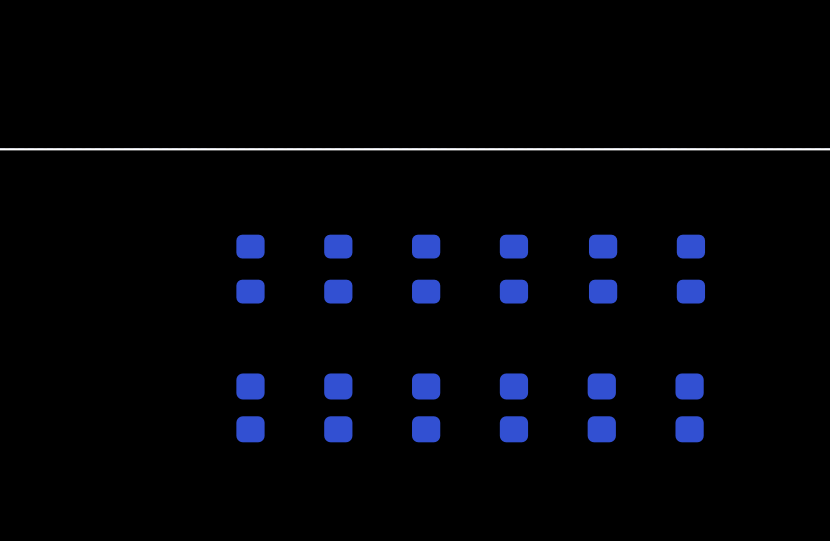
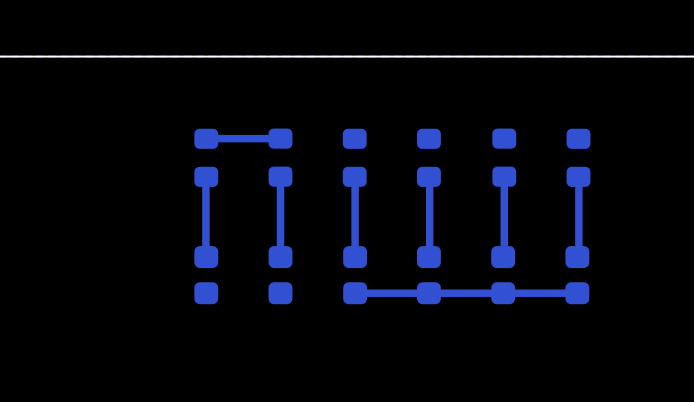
bottom track: none -> (205, 138) (280, 138)
bottom track: none -> (205, 176) (205, 257)
bottom track: none -> (280, 176) (280, 257)
bottom track: none -> (355, 176) (355, 257)
bottom track: none -> (429, 176) (429, 257)
bottom track: none -> (504, 176) (504, 257)
bottom track: none -> (578, 176) (578, 257)
bottom track: none -> (355, 293) (578, 293)

